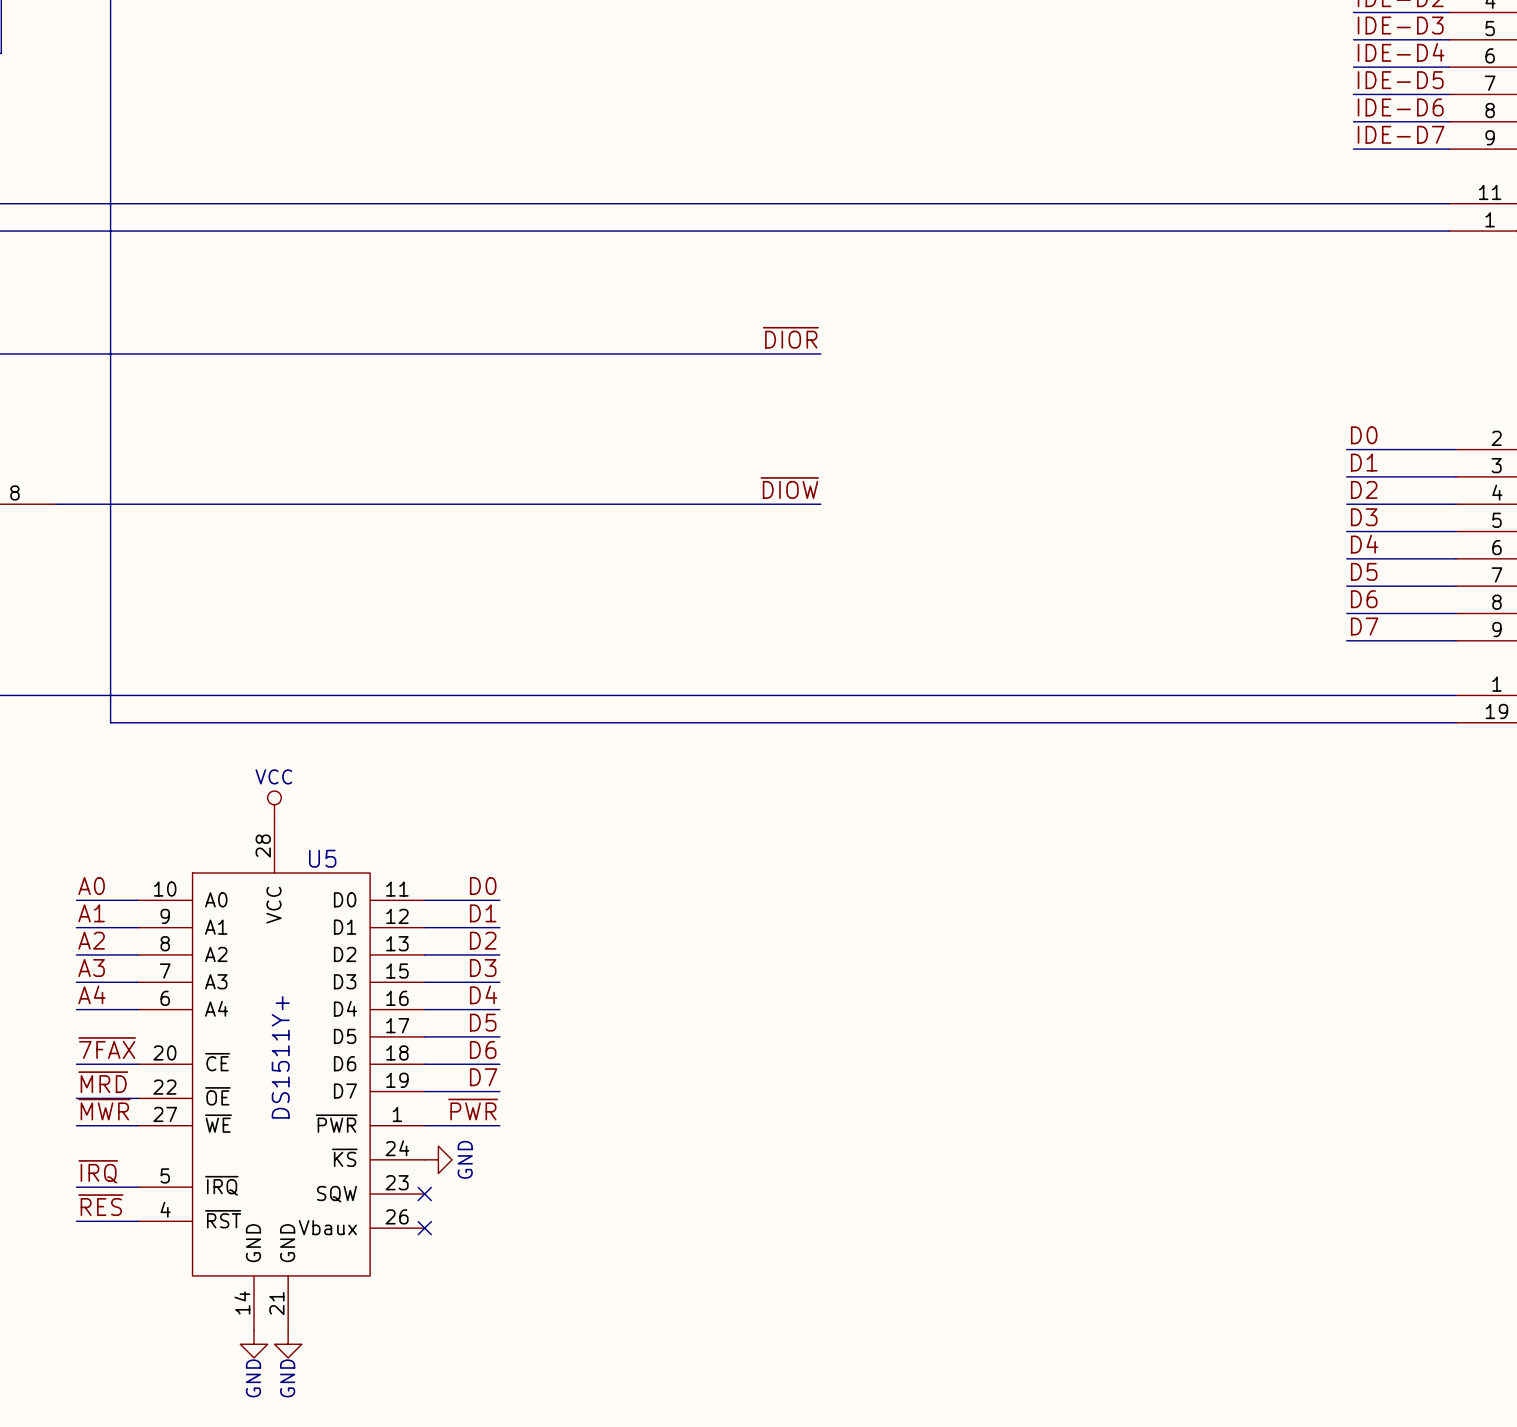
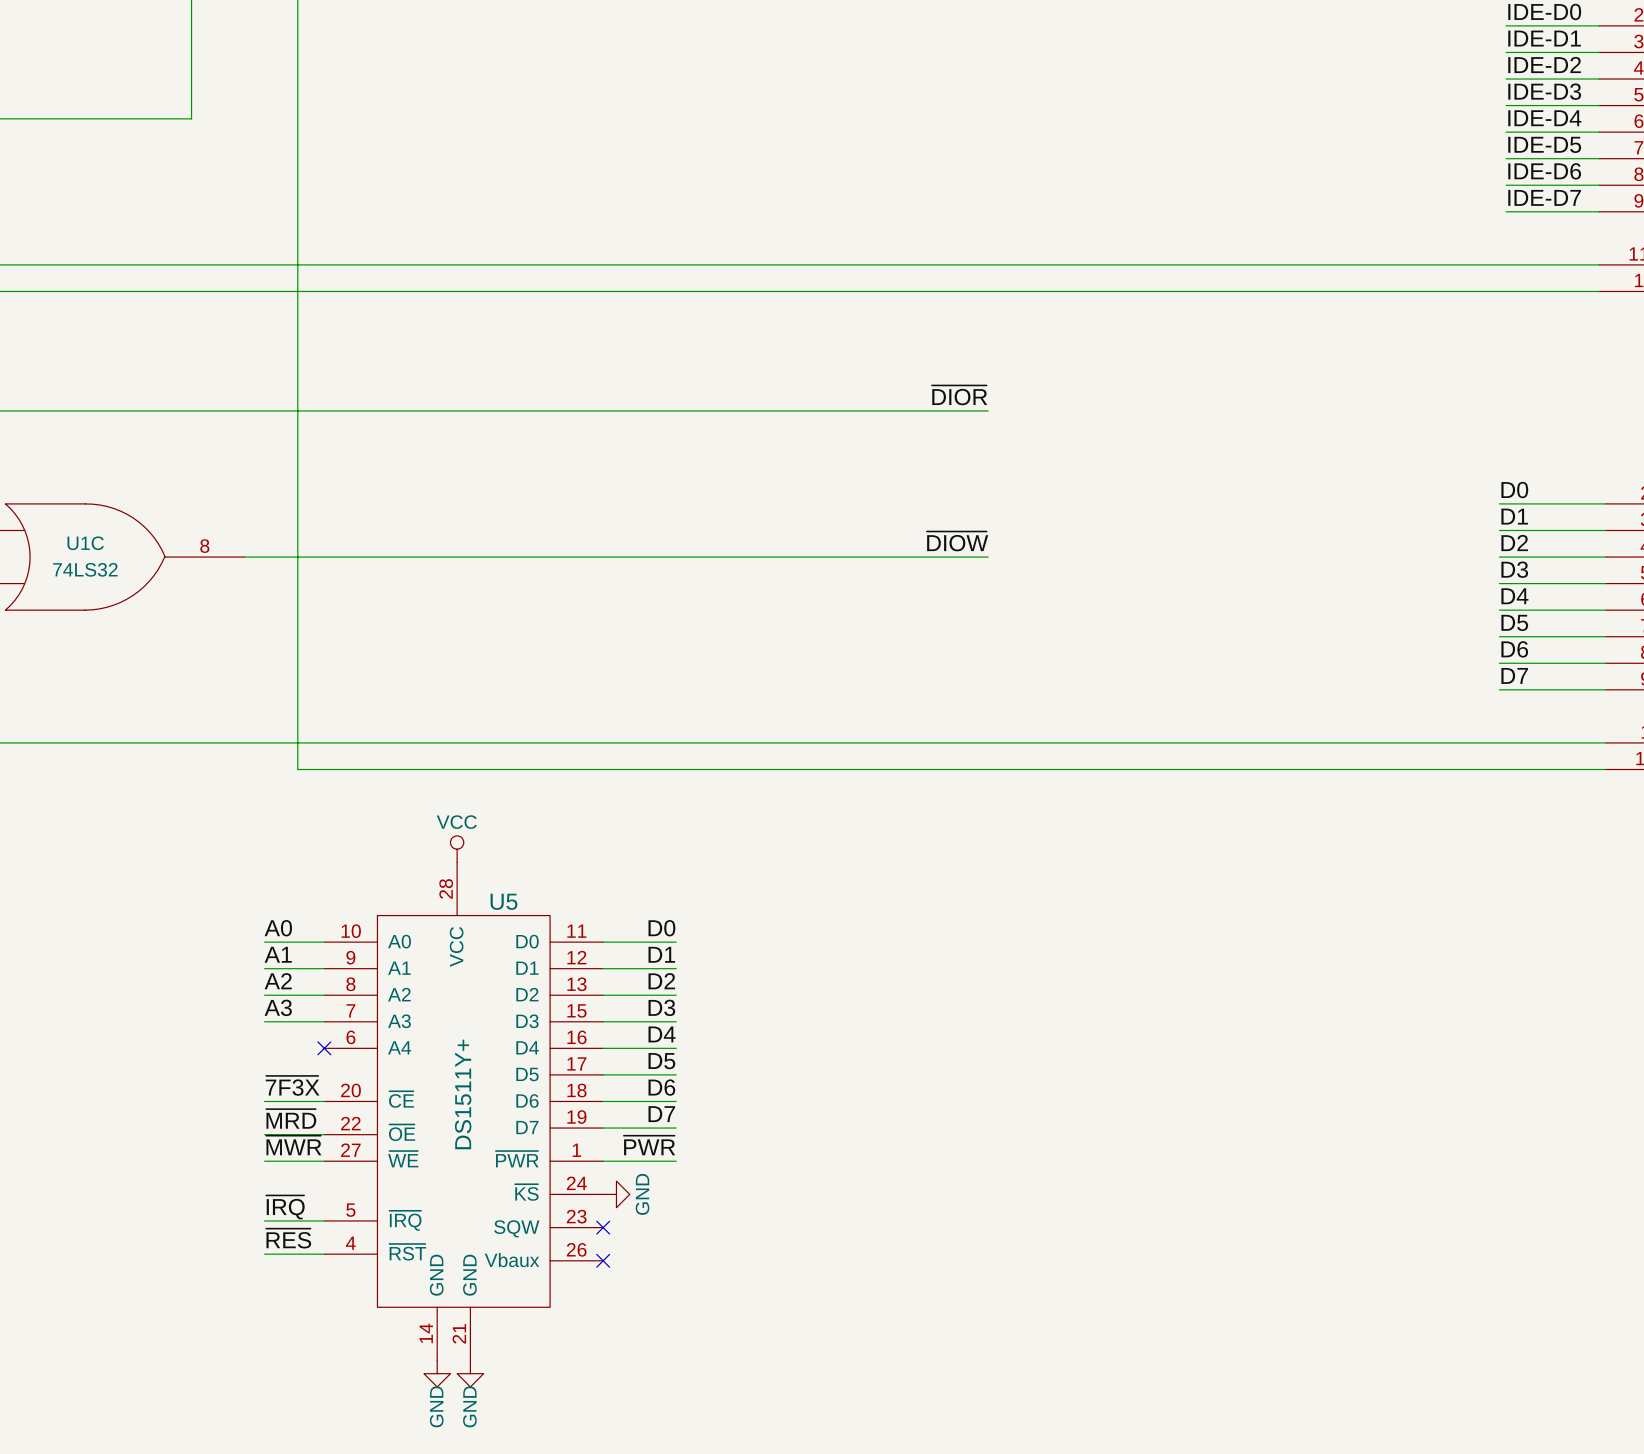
label: A4 (91, 994) -> none
wire: (76, 1009) (137, 1009) -> none
no-connect mark: none -> (324, 1048)
label: ~{7FAX} (107, 1048) -> ~{7F3X} (292, 1085)

